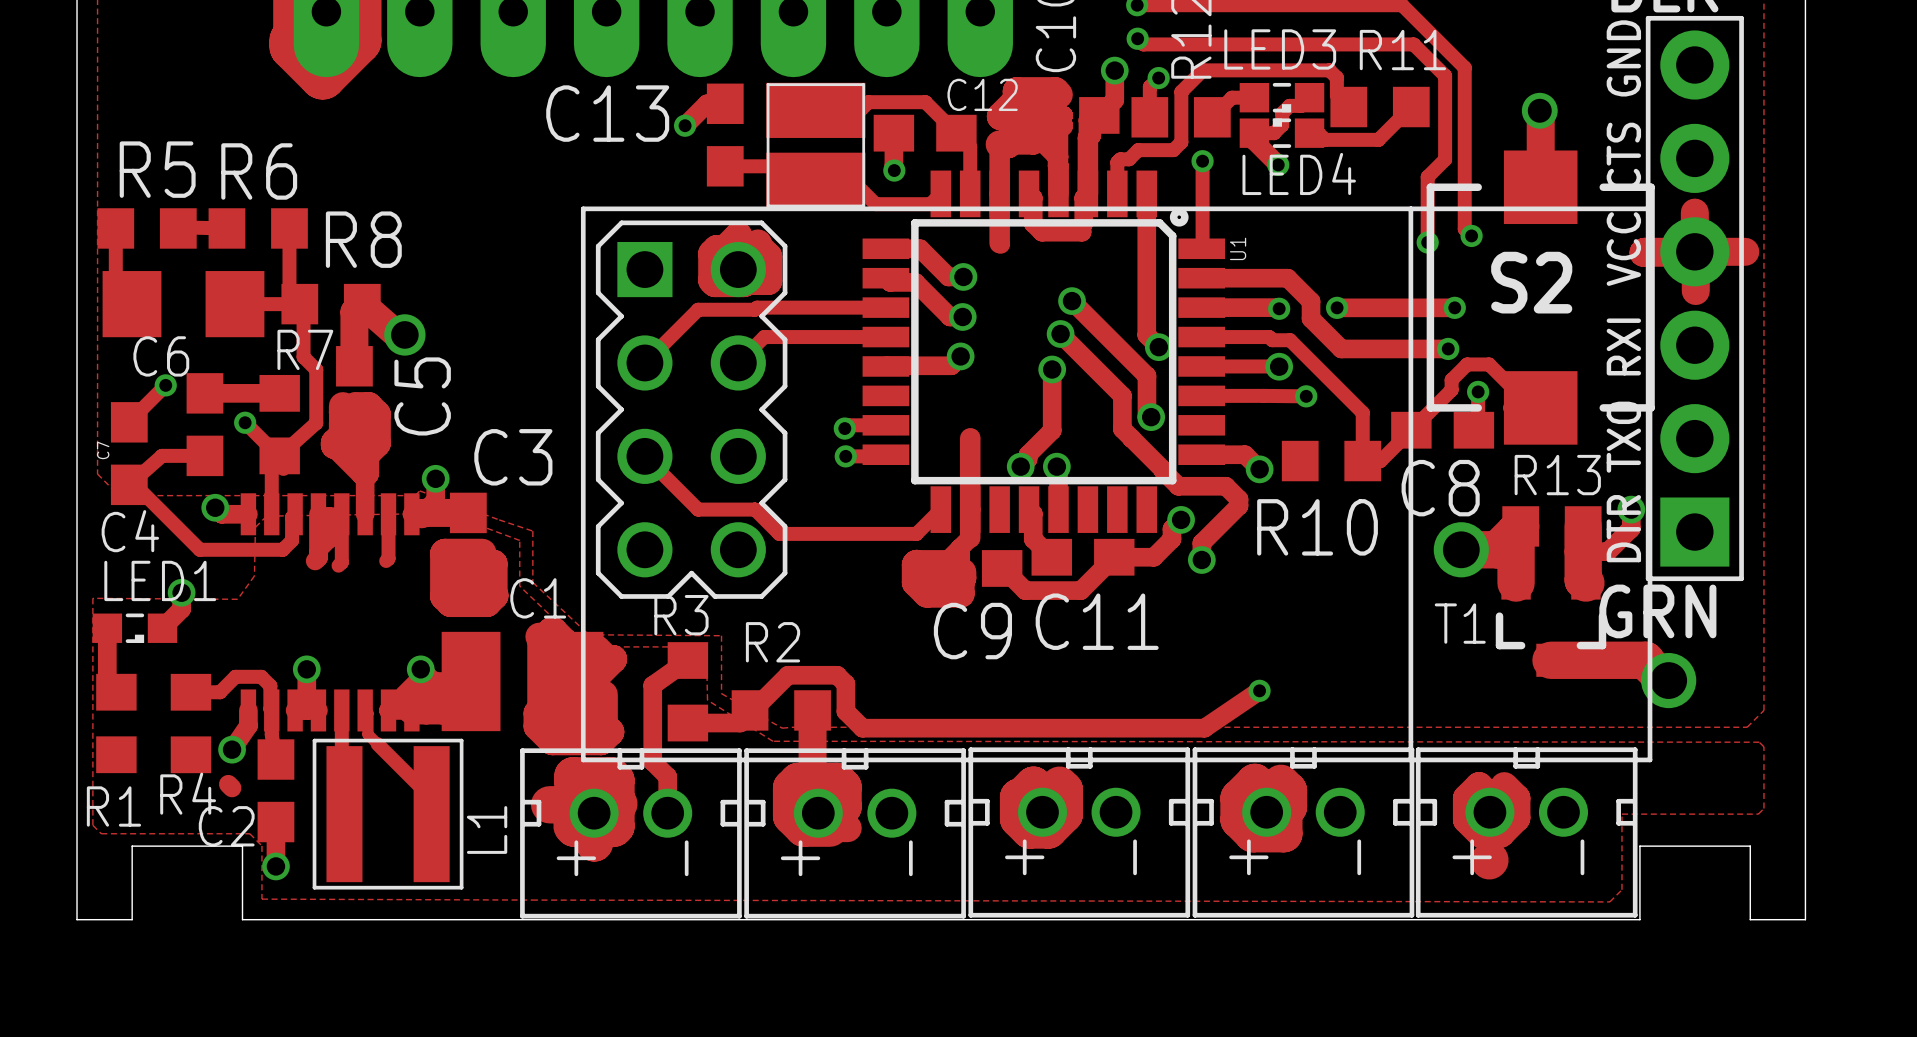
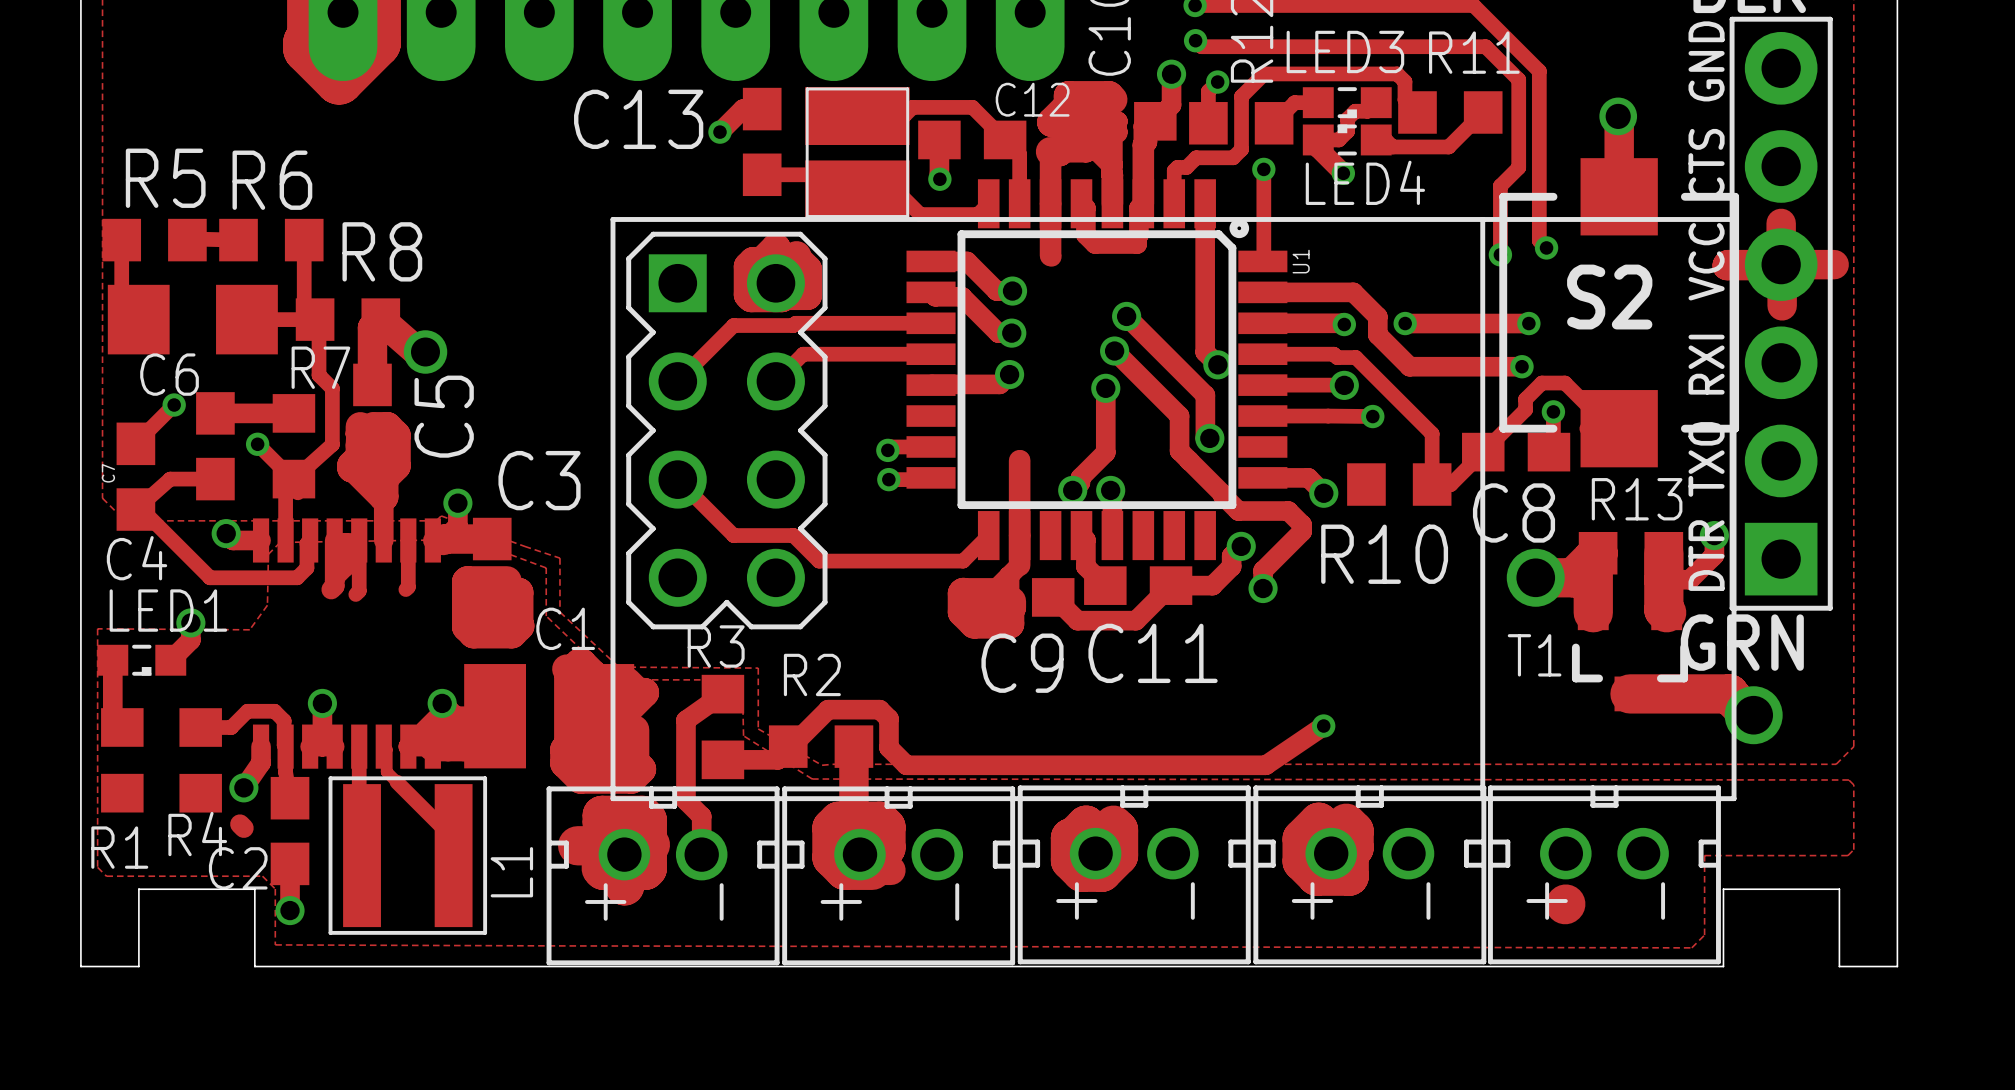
track: (1504, 786) (1516, 798) (1516, 817) (1500, 833) (1480, 833) (1466, 819) (1466, 798) (1479, 786) (1489, 796) (1489, 812) -> none

